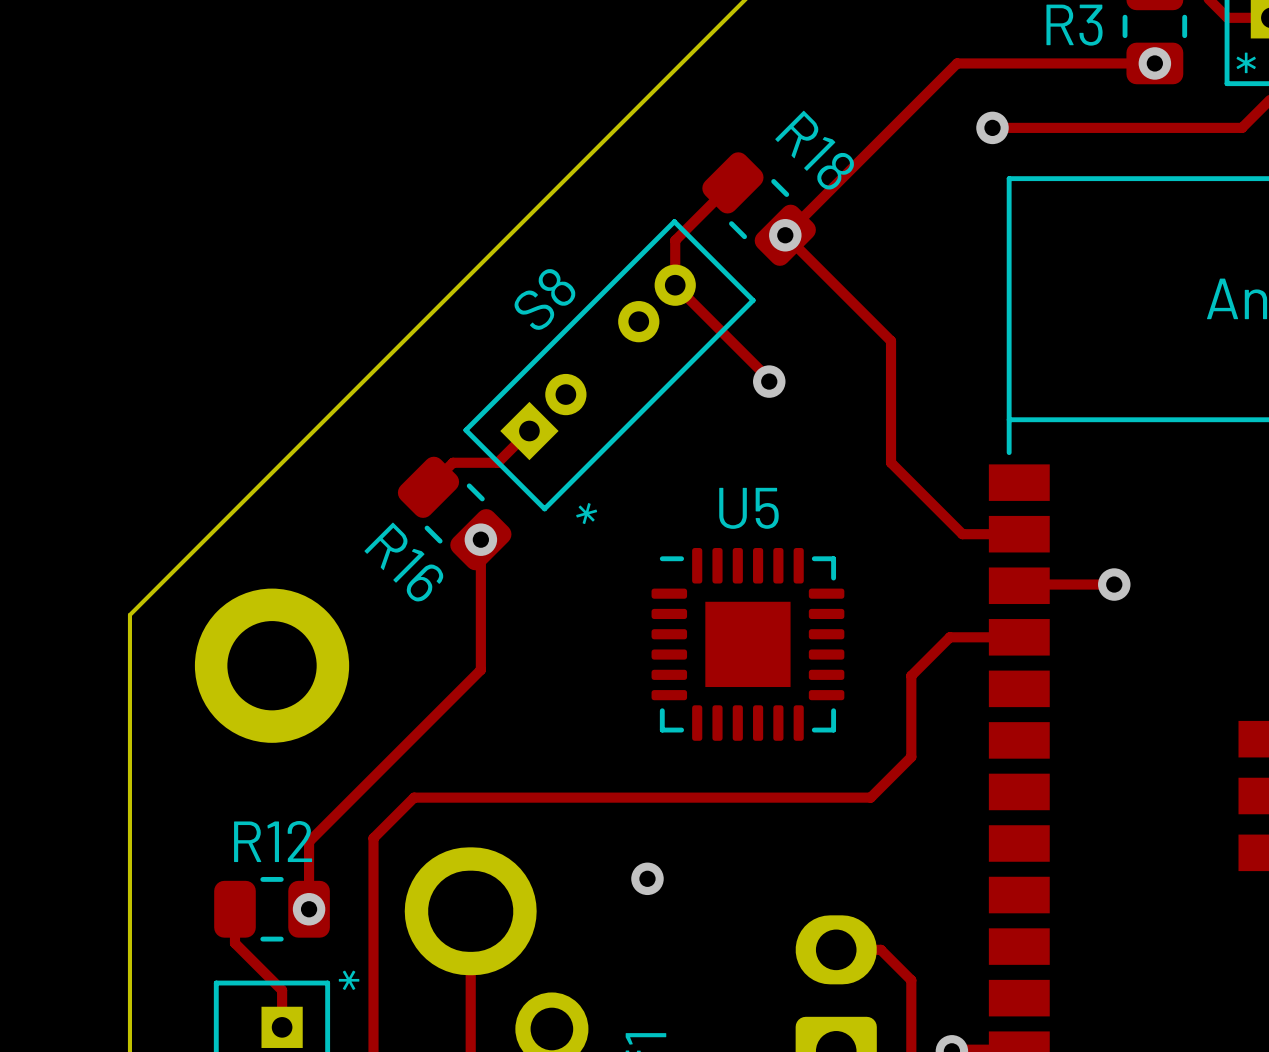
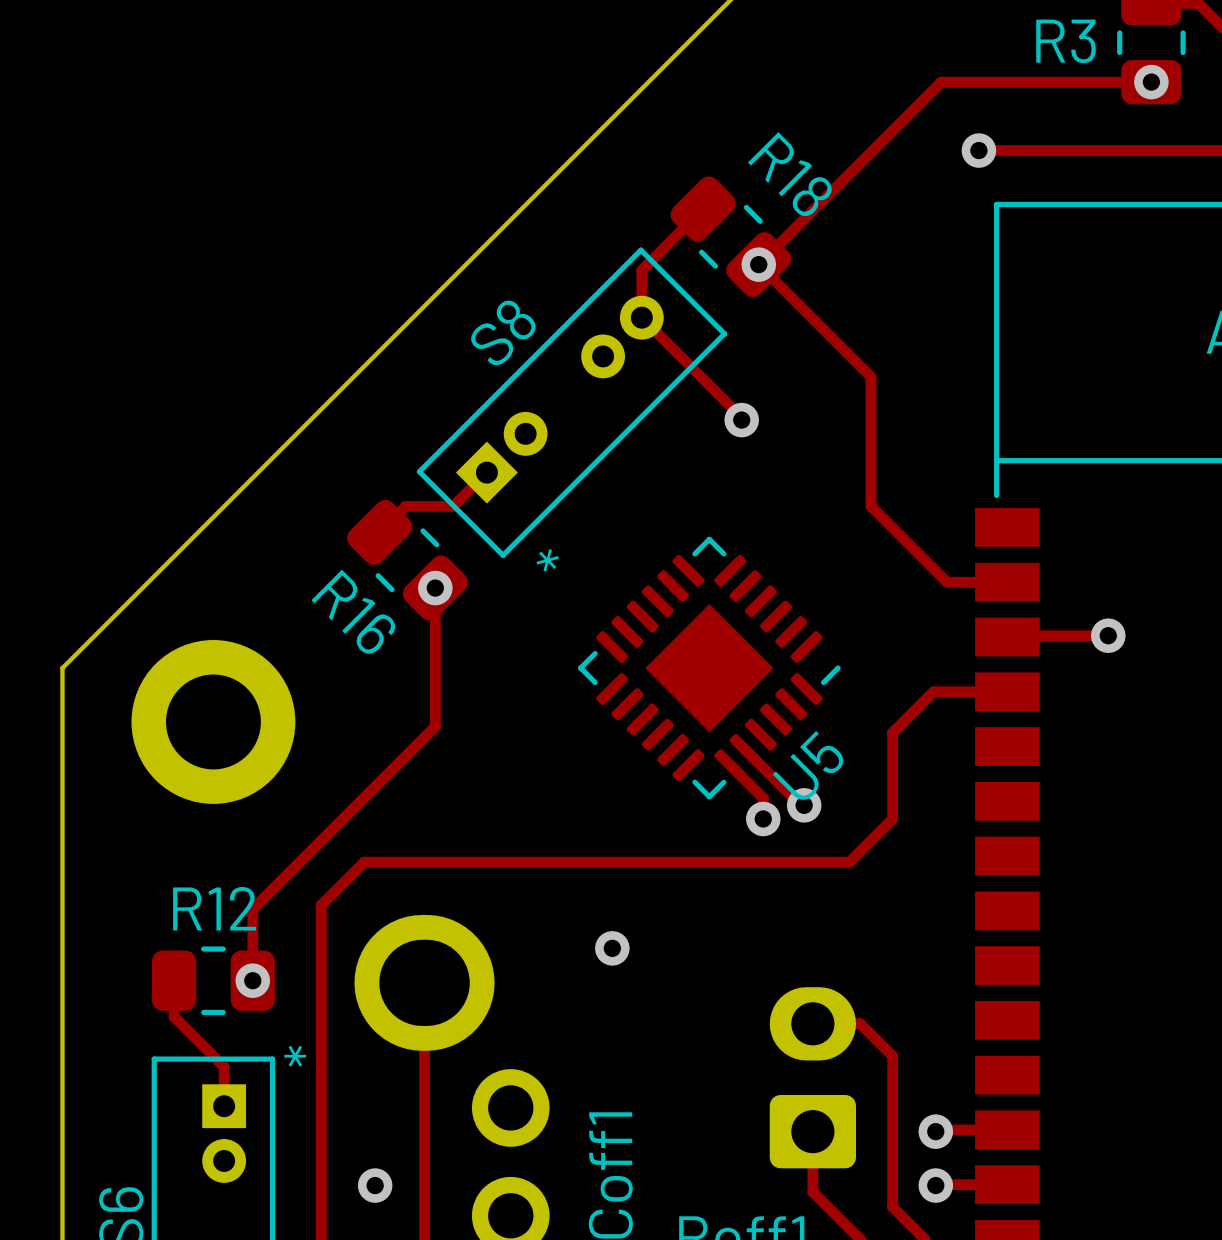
U5 rotation: 0° (747, 644) -> 135° clockwise (709, 668)
track: none -> (745, 750) (800, 805) (804, 805)
track: none -> (730, 765) (763, 798) (763, 818)
via: none -> (804, 805)
via: none -> (763, 818)

